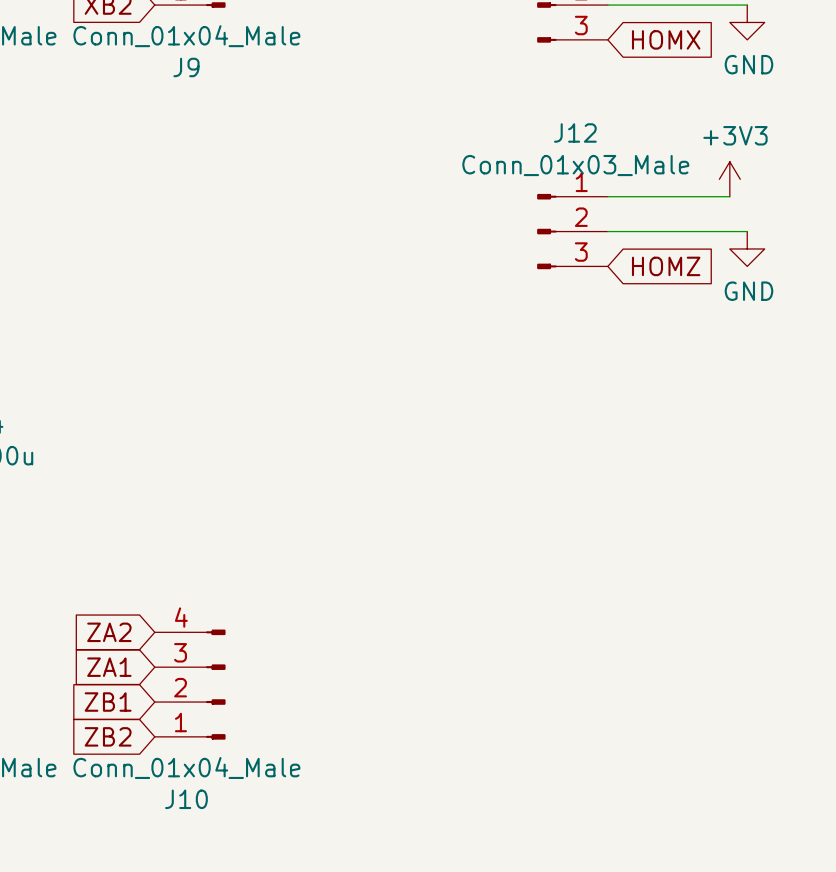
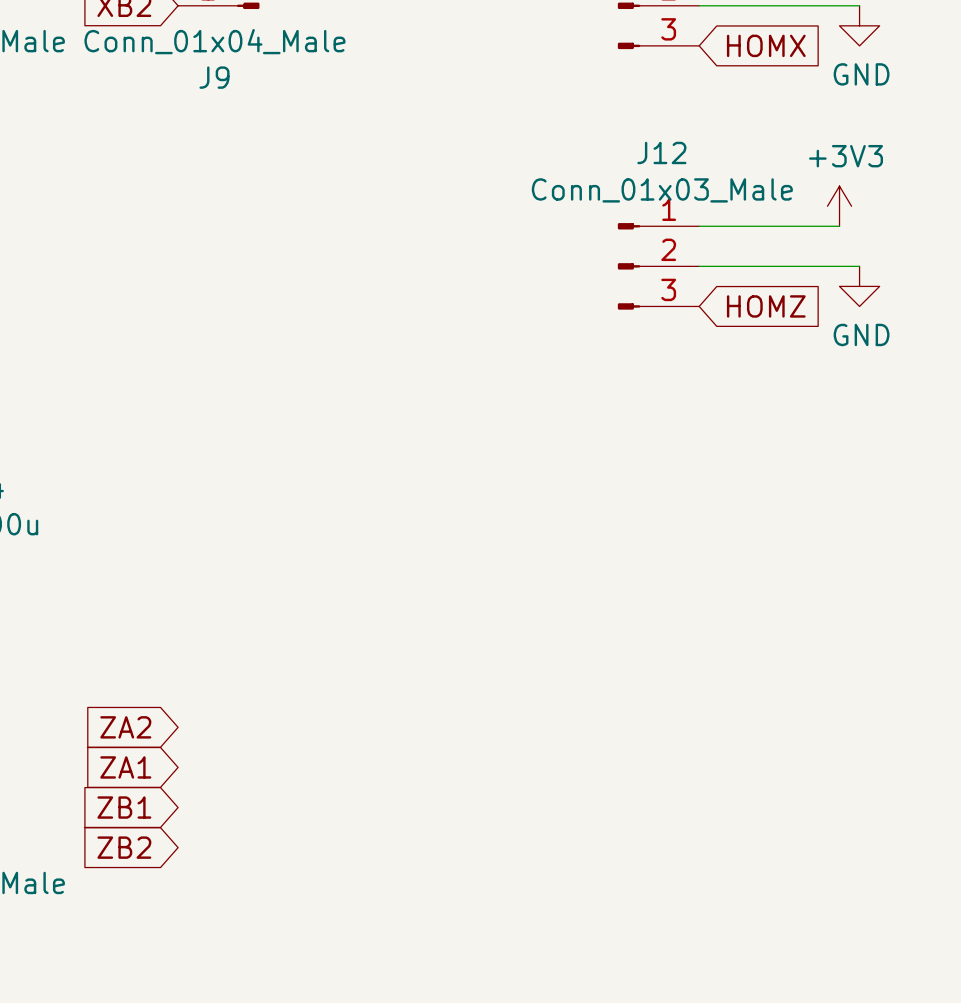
J10: Conn_01x04_Male (190, 684) -> none

